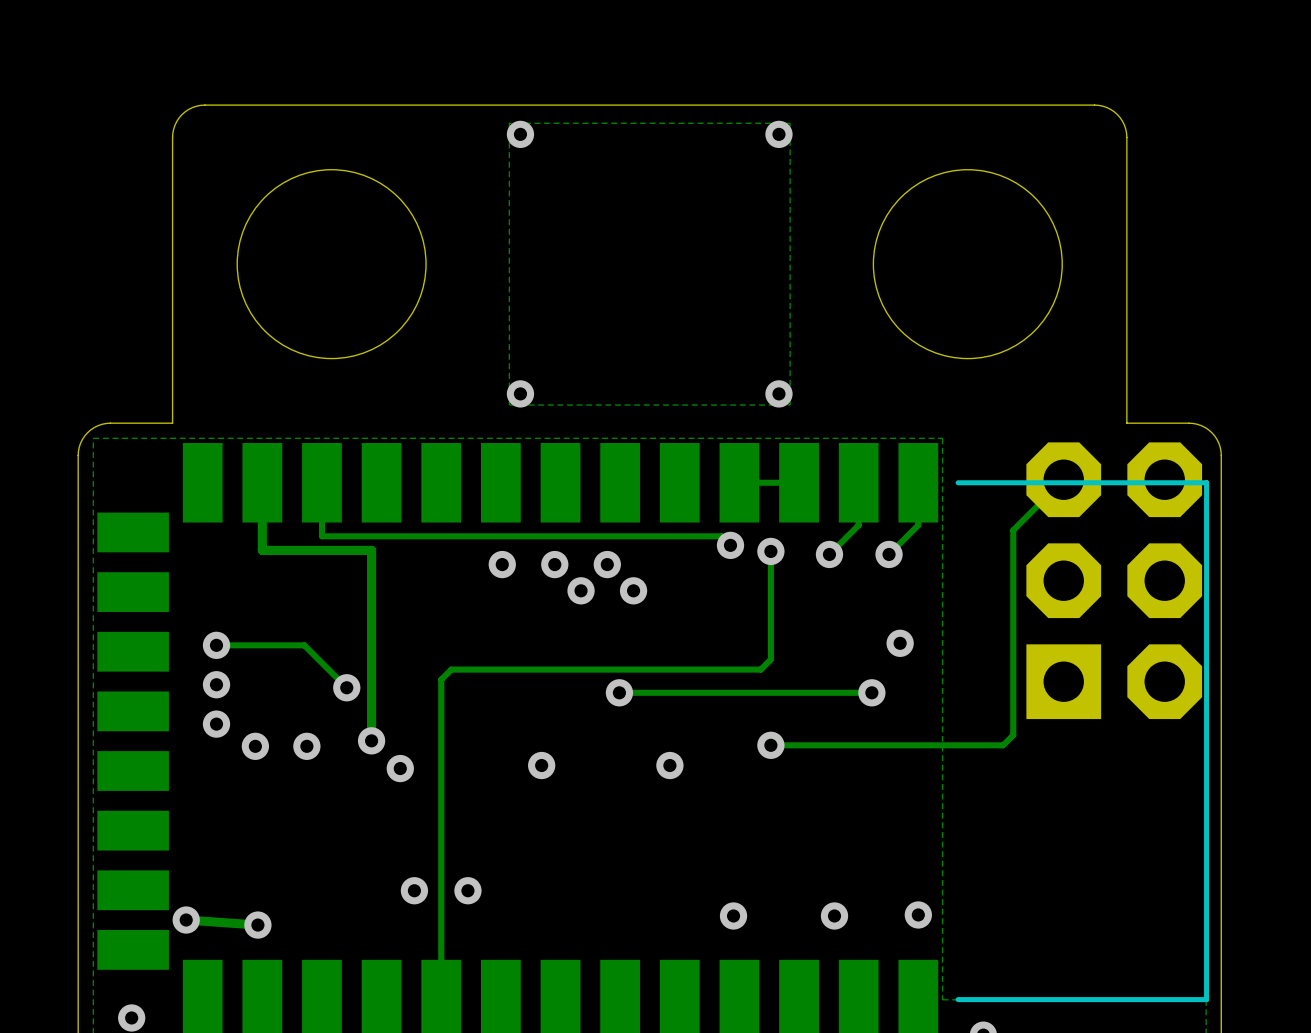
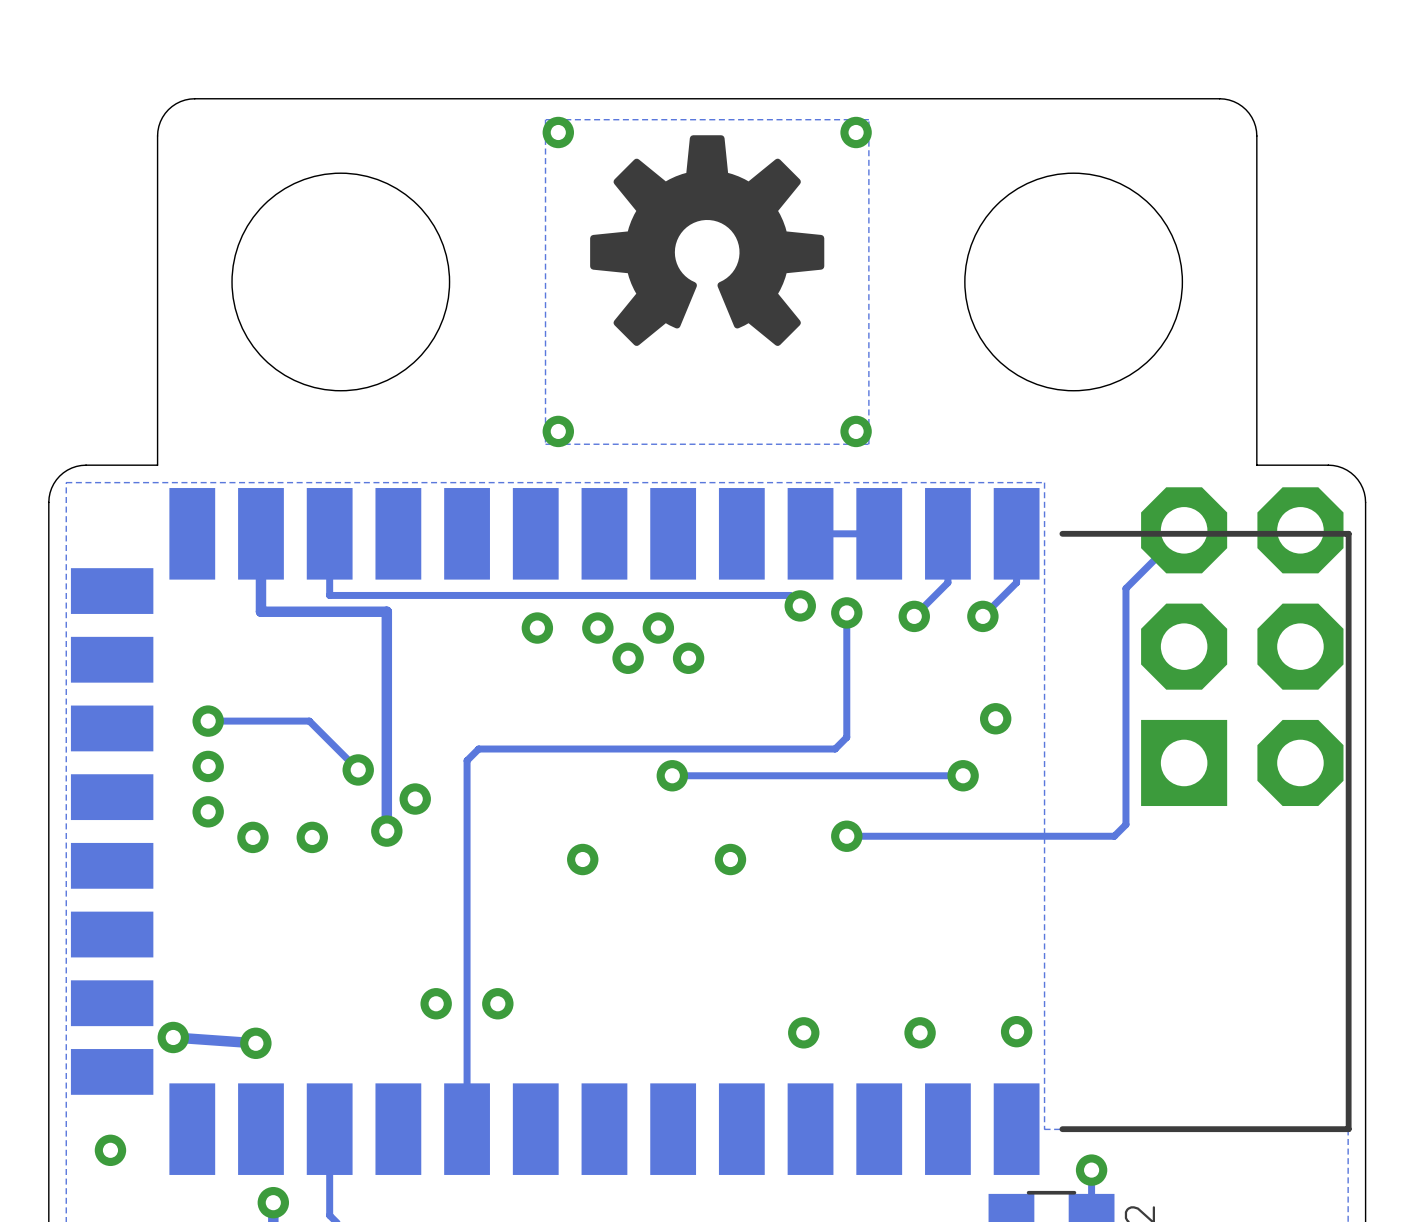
drawing: none -> [590, 135, 825, 346]
via position: (400, 768) -> (415, 799)

